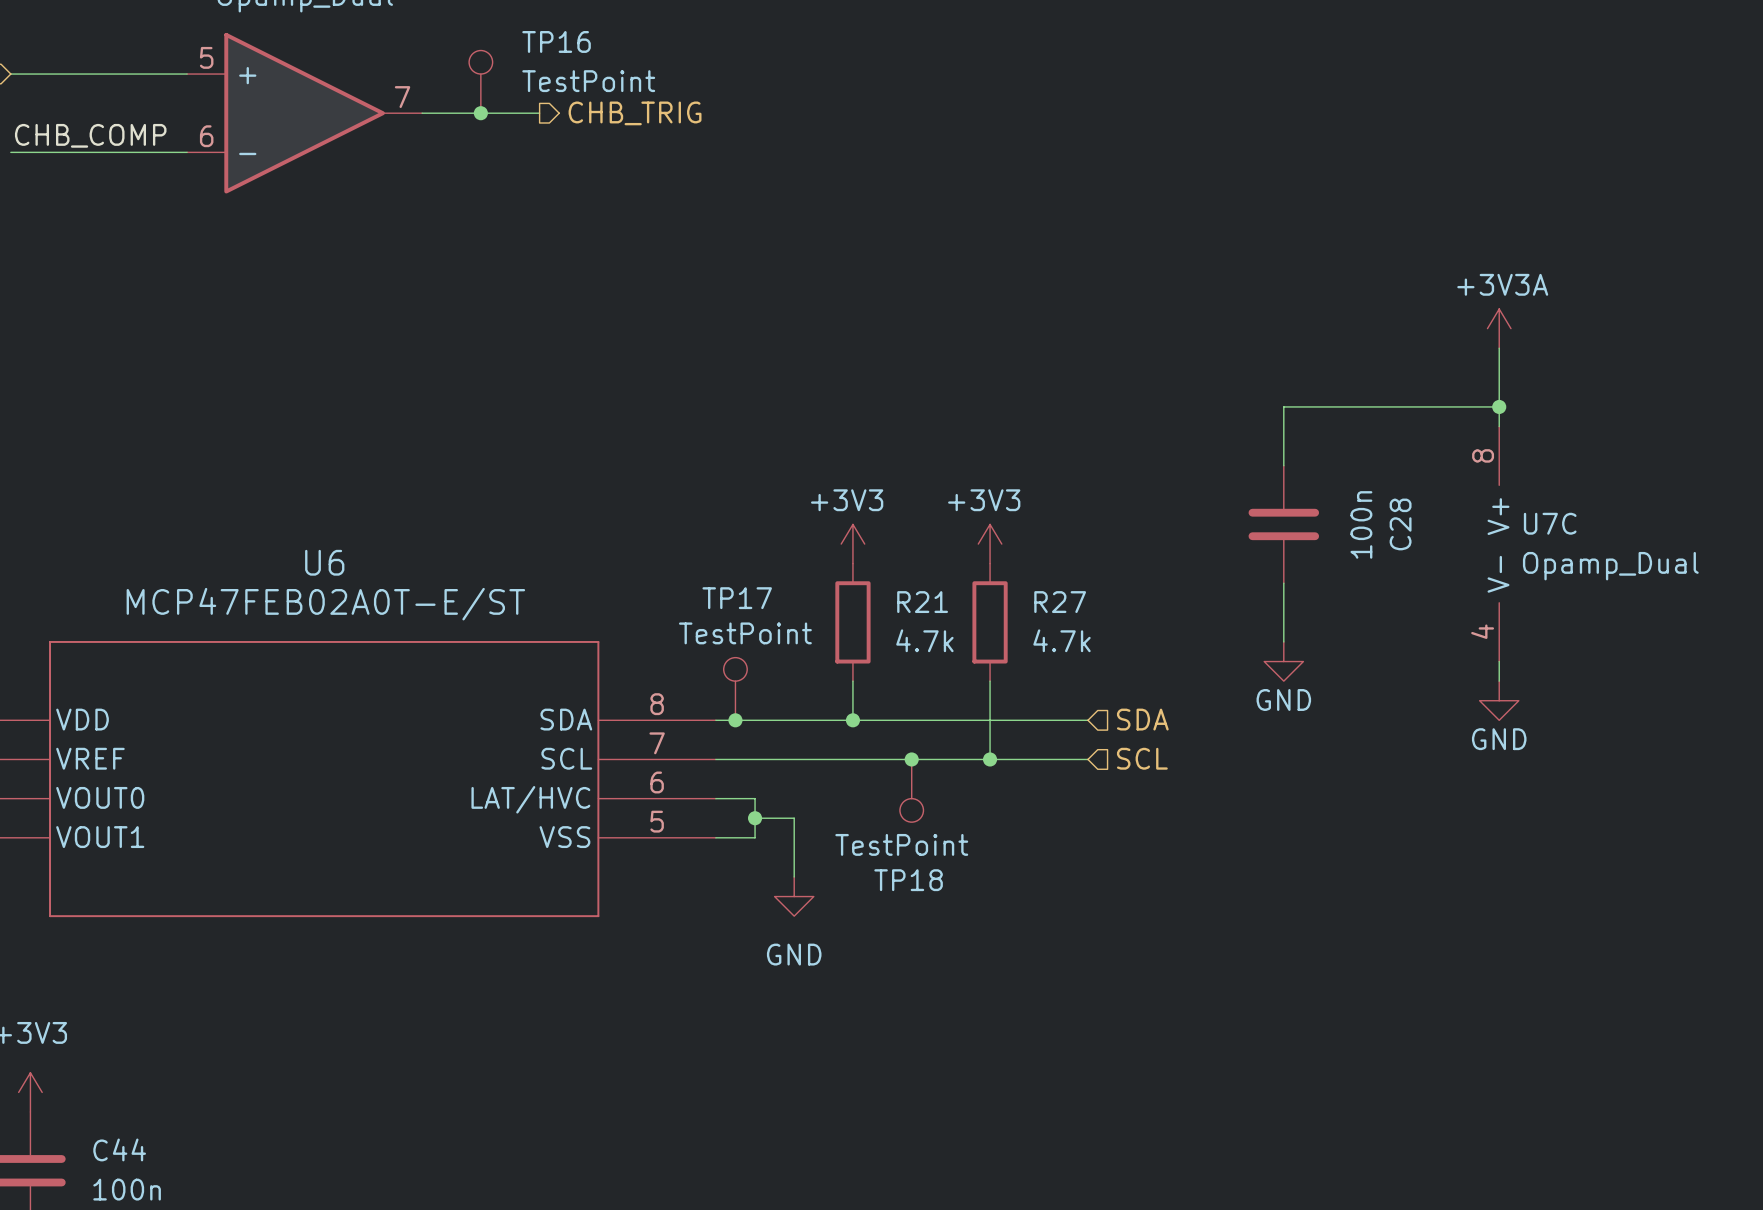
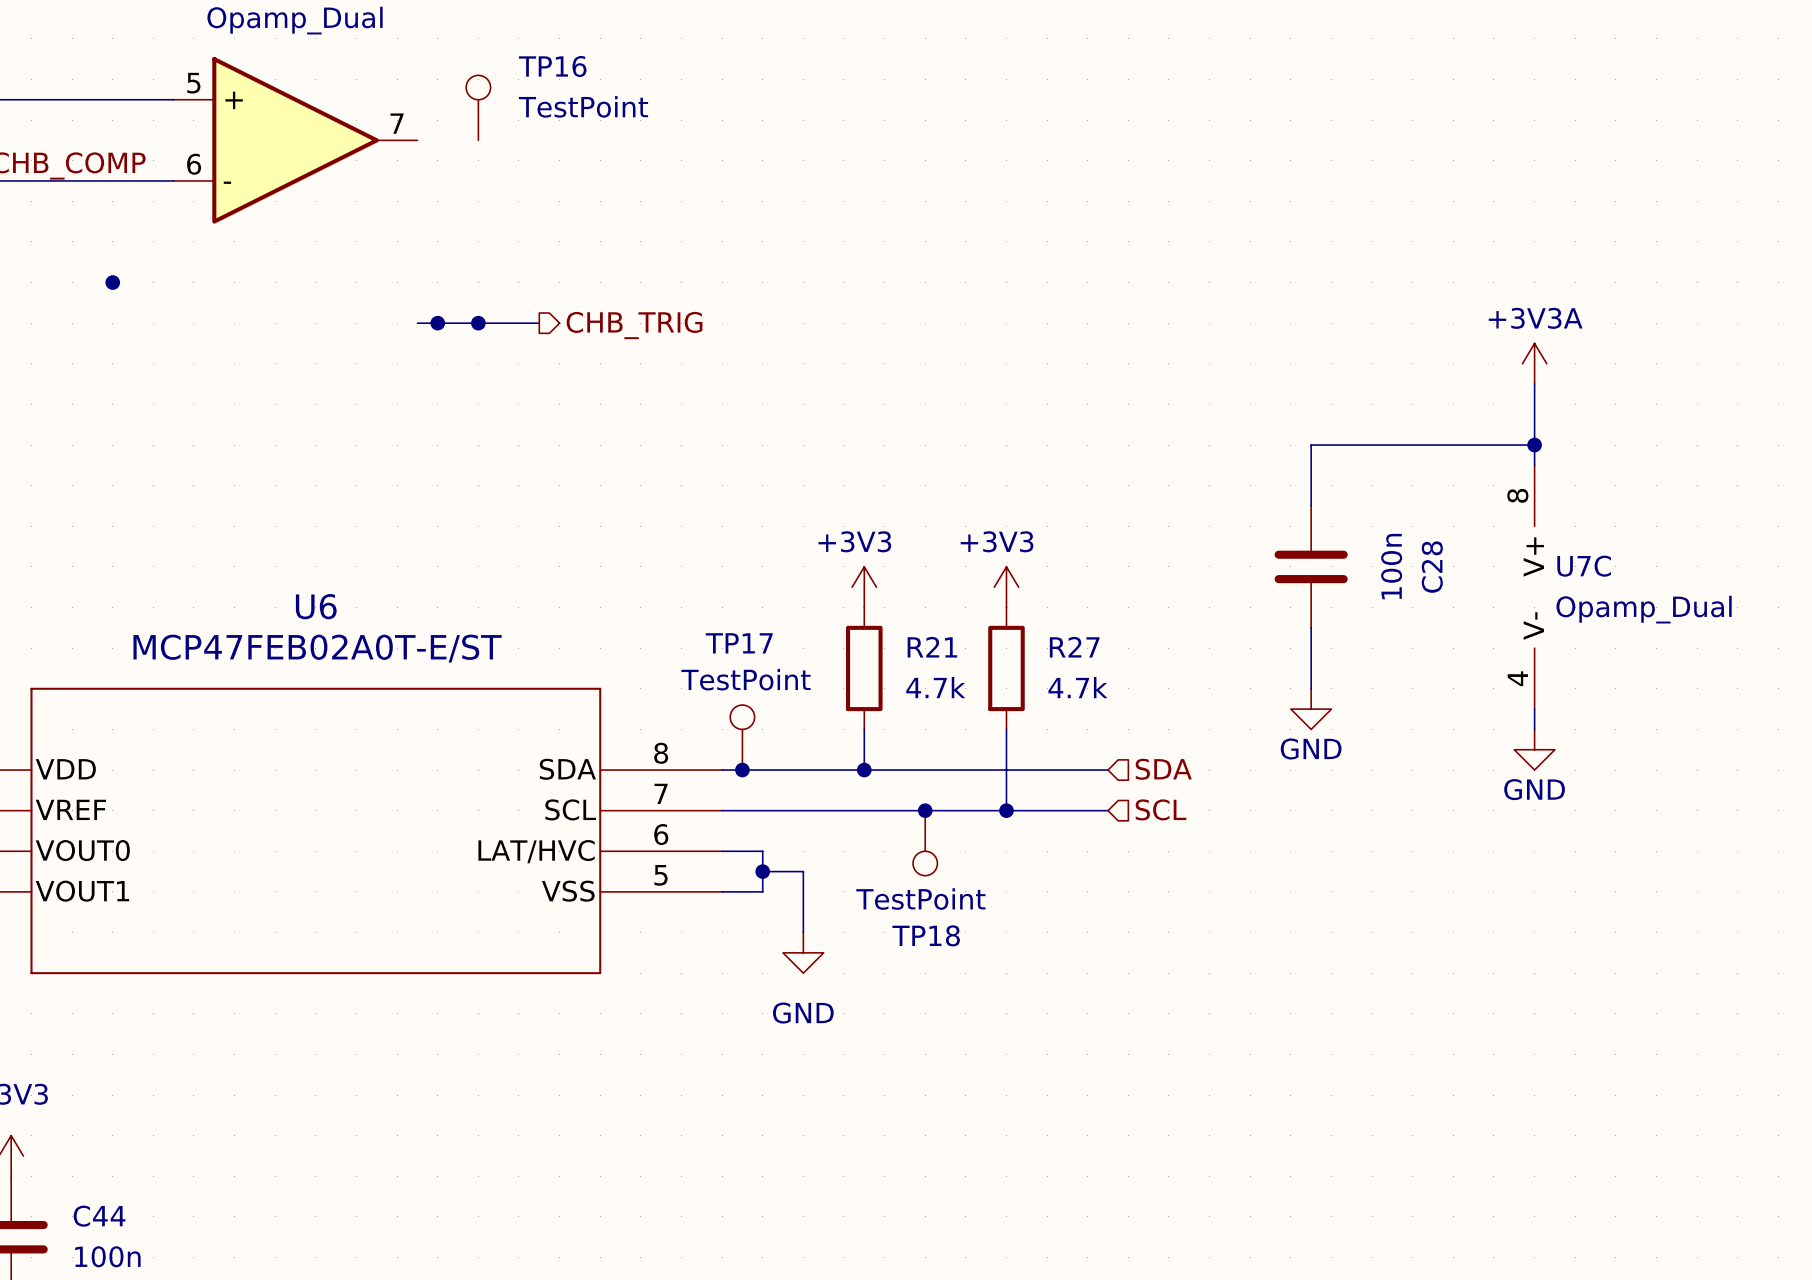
wire: (422, 113) (539, 113) -> (417, 323) (539, 323)
junction: (480, 113) -> none
hierarchical label position: CHB_TRIG (635, 113) -> CHB_TRIG (634, 325)
junction: none -> (112, 282)
junction: none -> (437, 323)
junction: none -> (478, 323)

